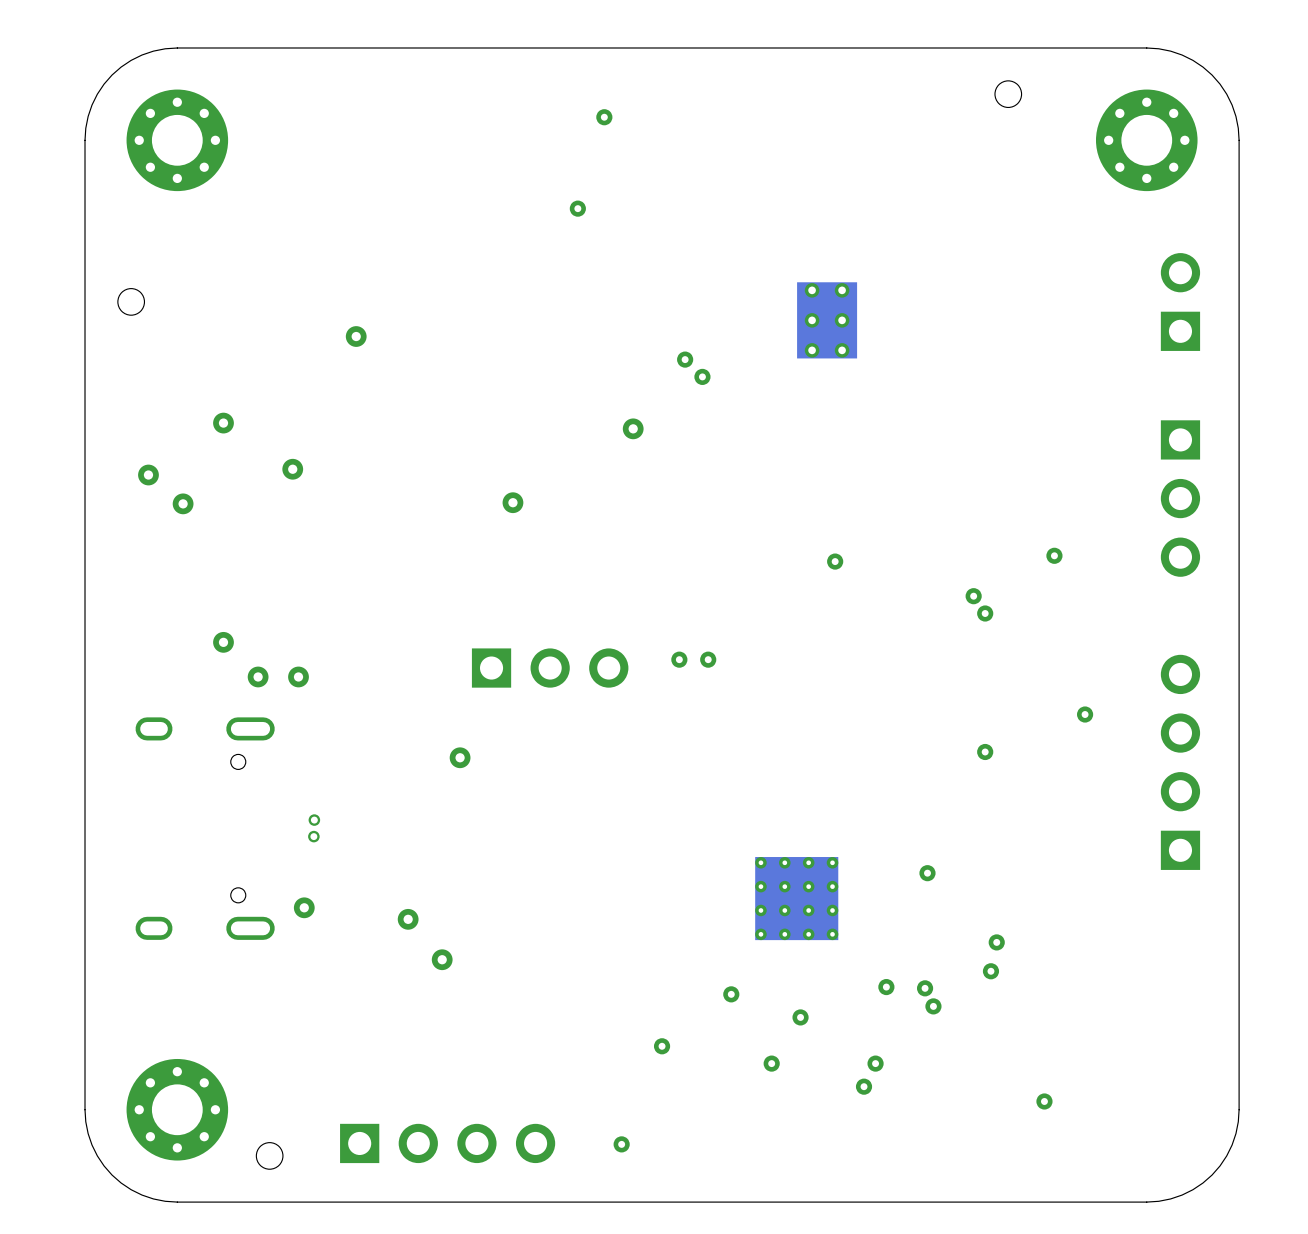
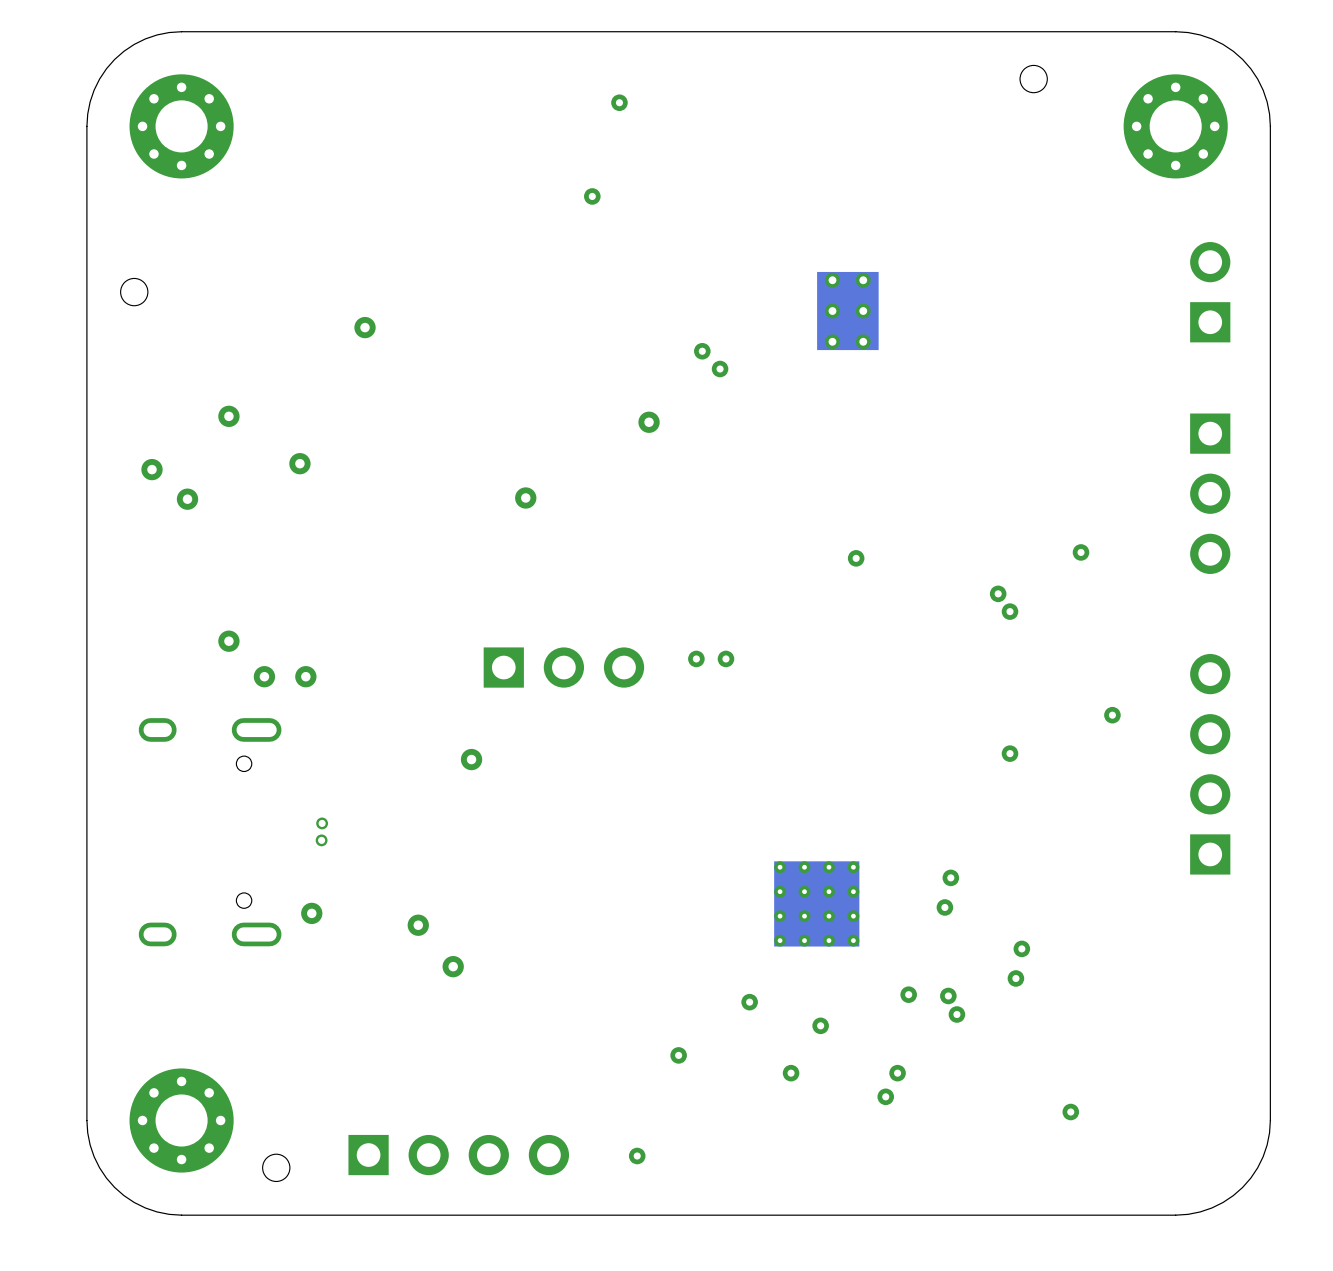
via: none -> (944, 907)

